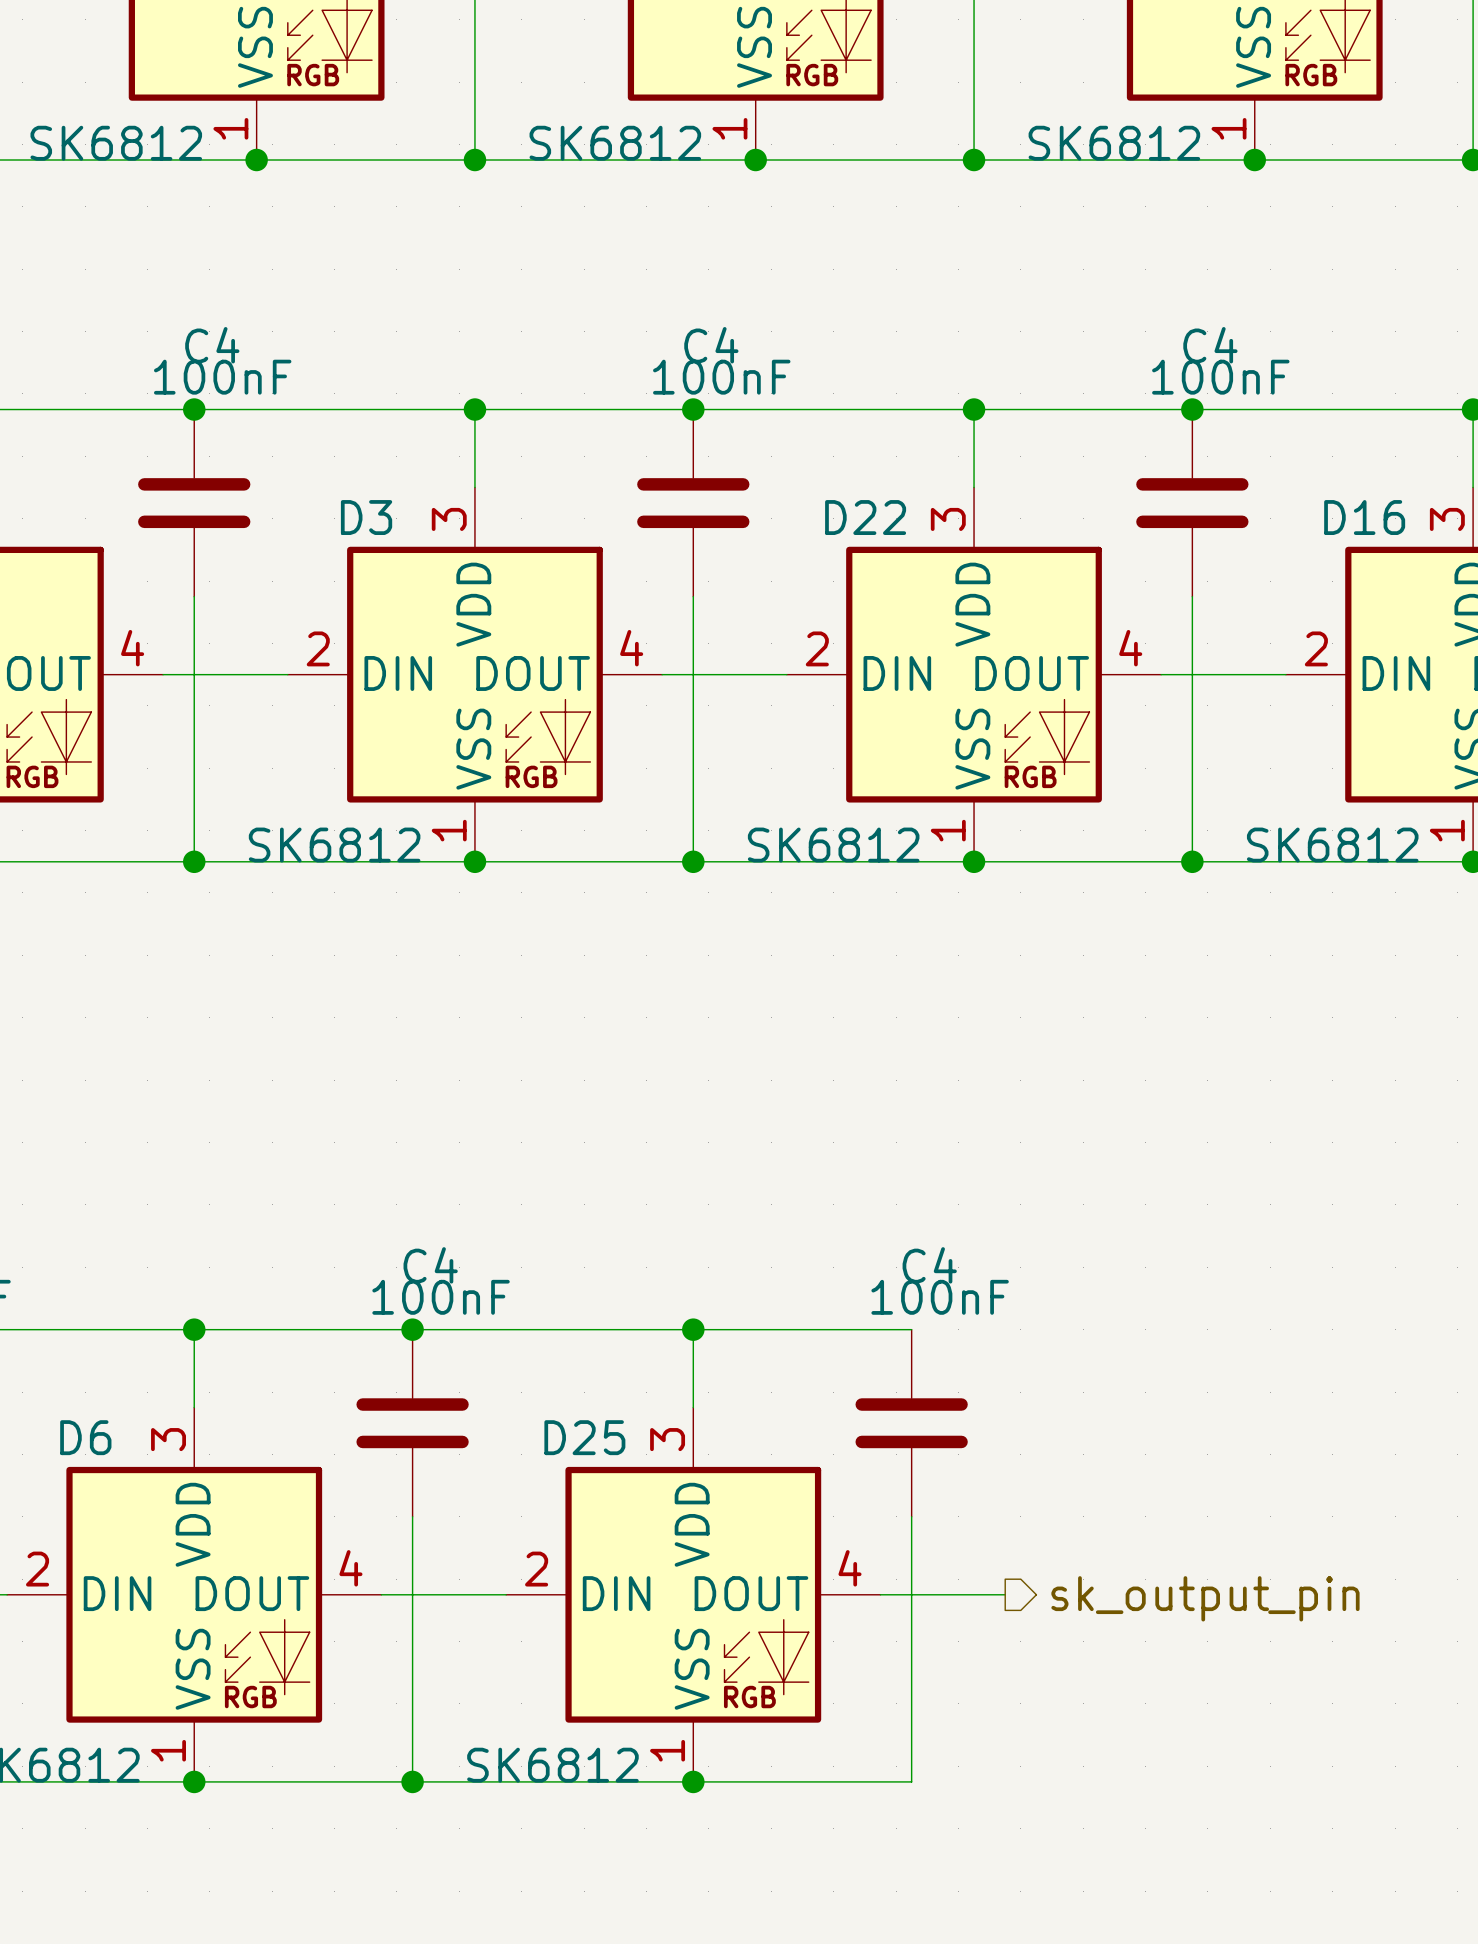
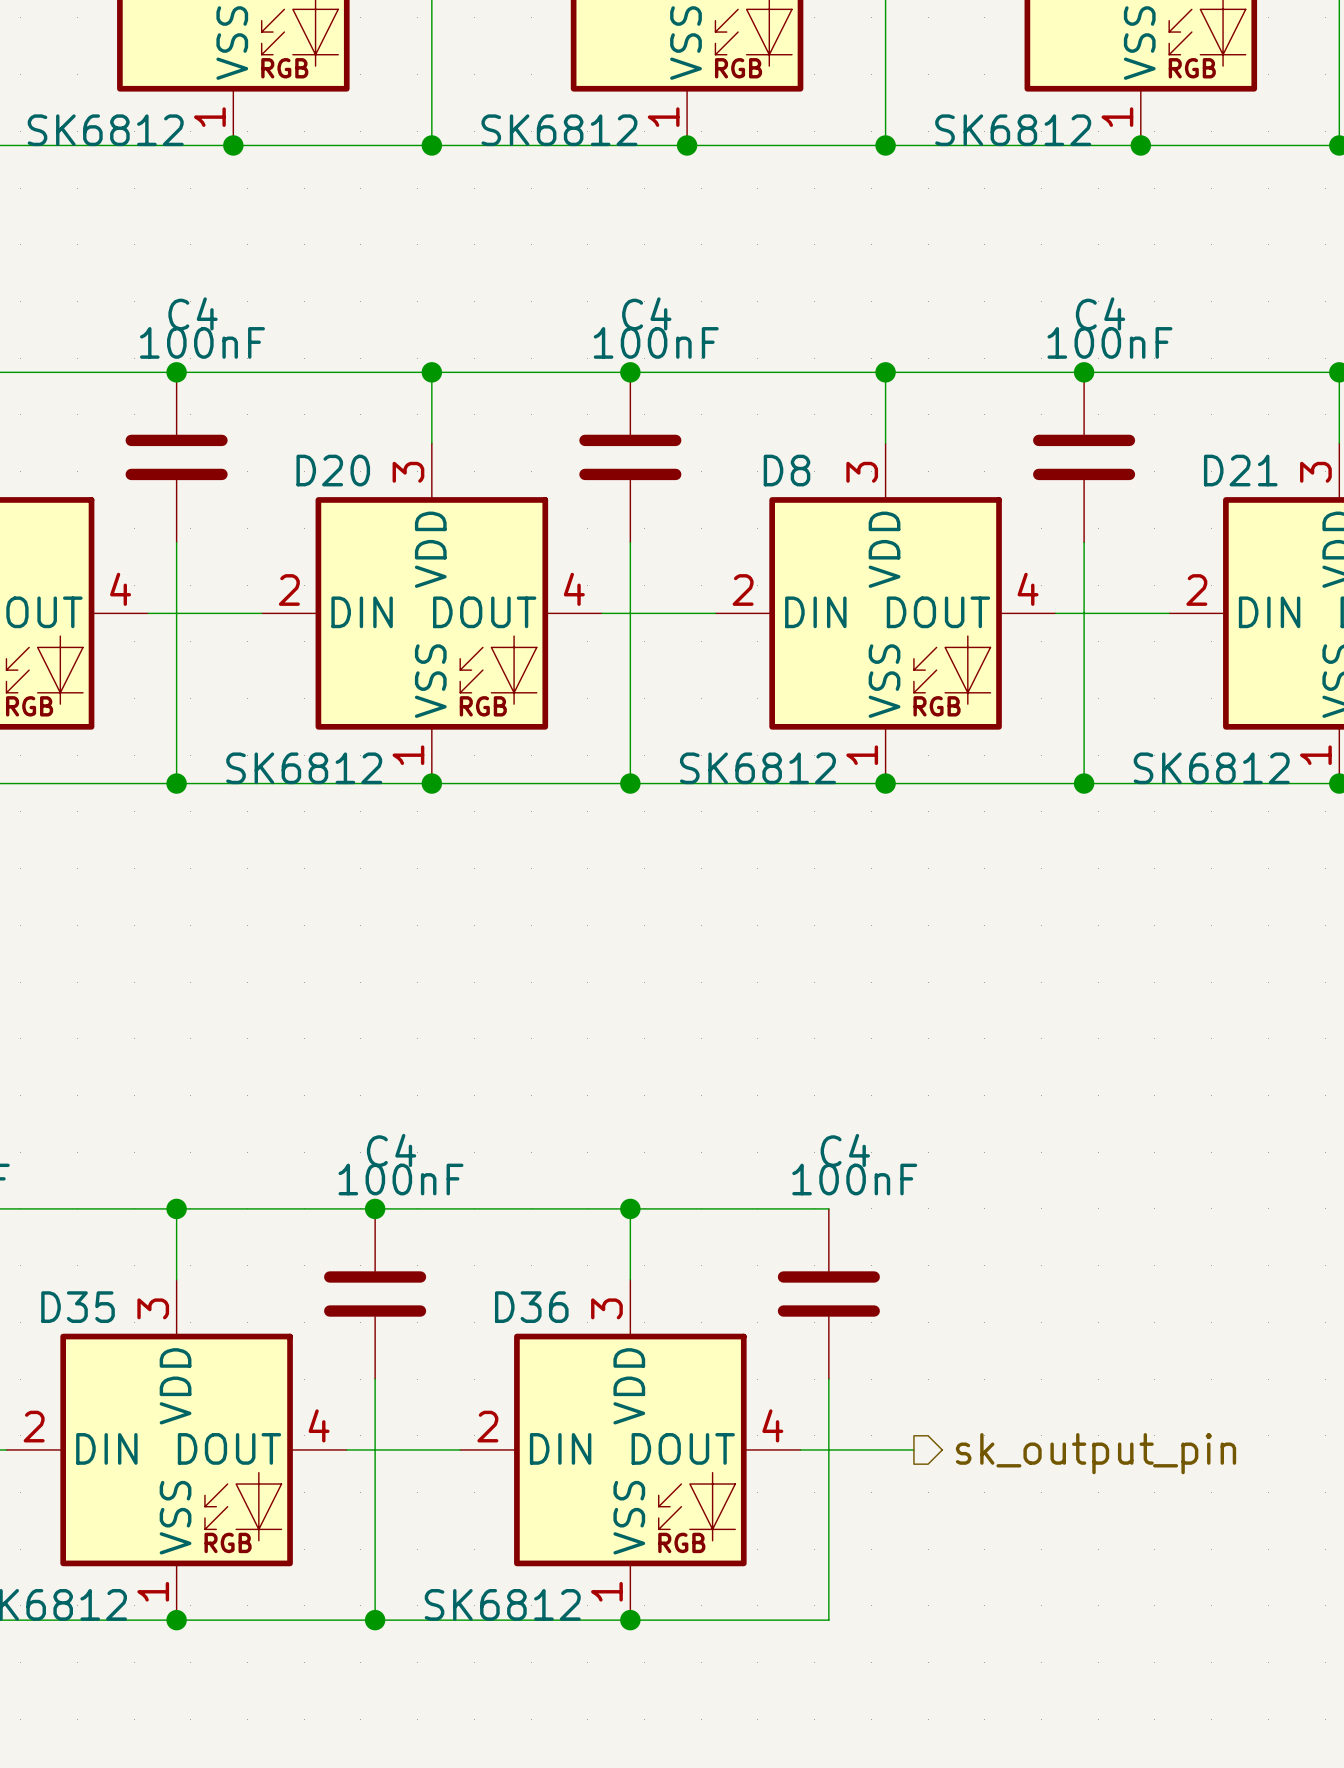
D3 name: D3 (366, 517) -> D20 (333, 470)
D22 name: D22 (865, 517) -> D8 (787, 470)
D16 name: D16 (1364, 517) -> D21 (1240, 470)
D6 name: D6 (85, 1437) -> D35 (78, 1307)
D25 name: D25 (584, 1437) -> D36 (531, 1307)

